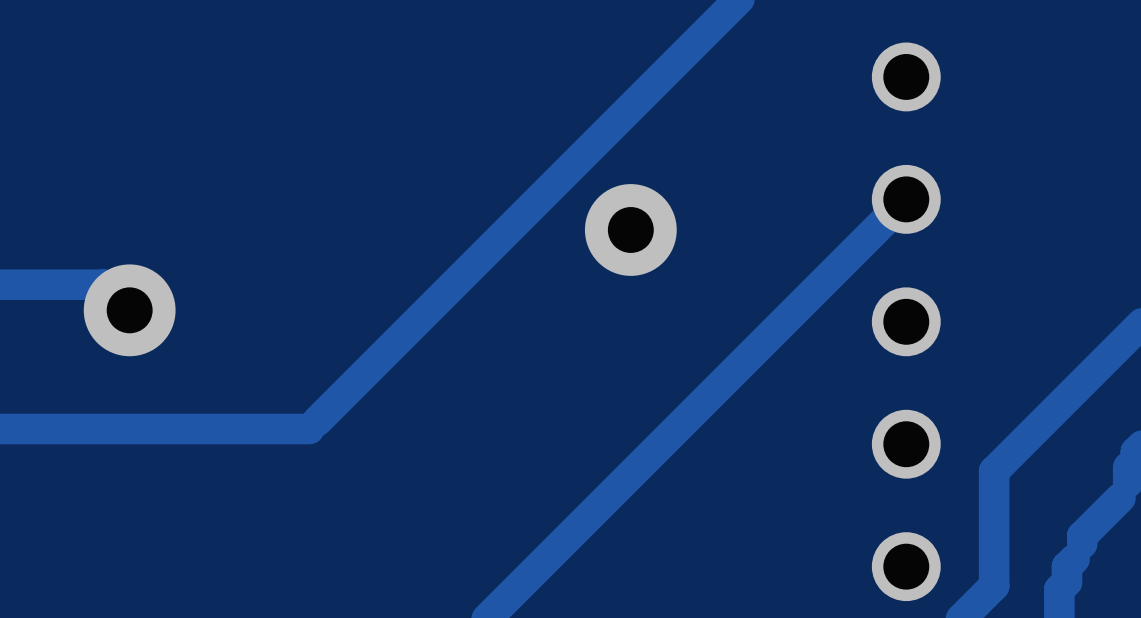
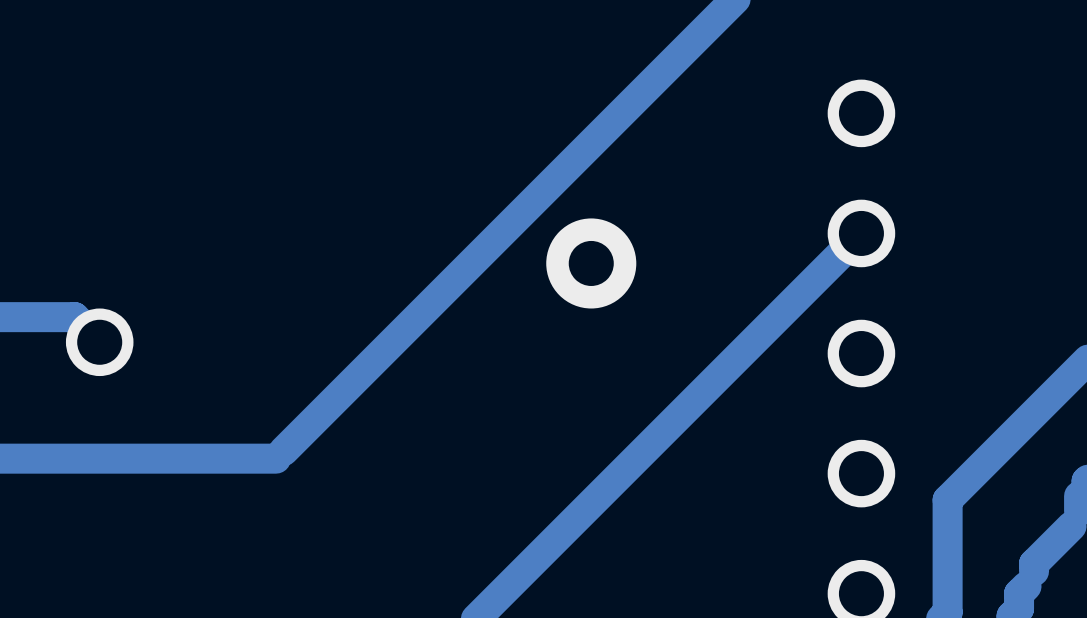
via size: [83, 264, 176, 357] -> [65, 308, 134, 377]

